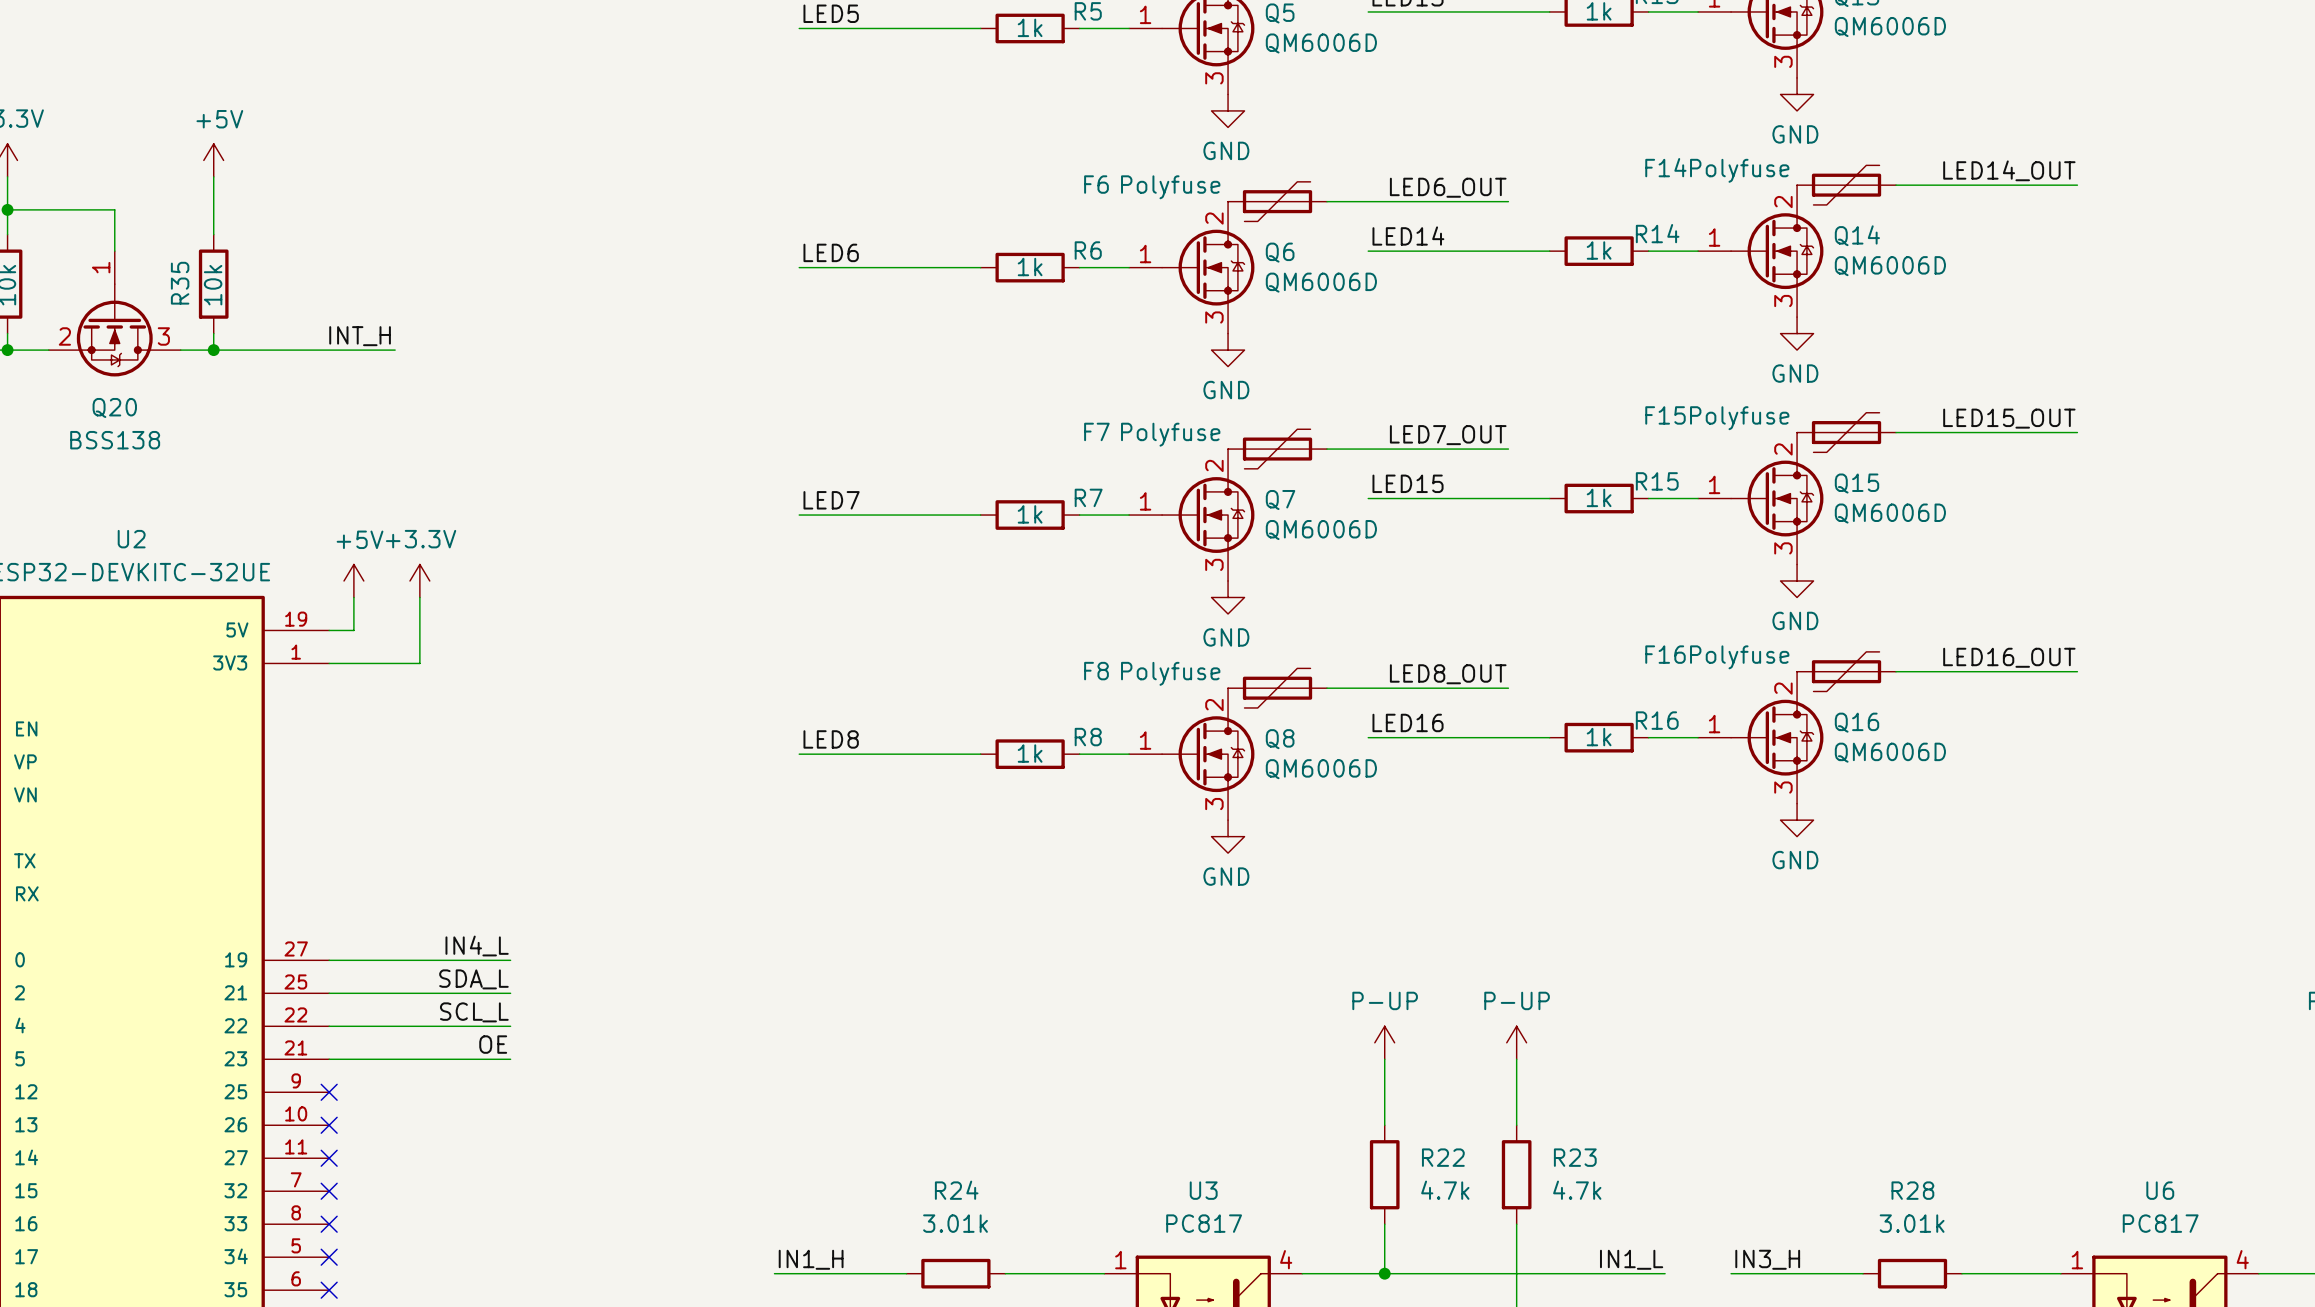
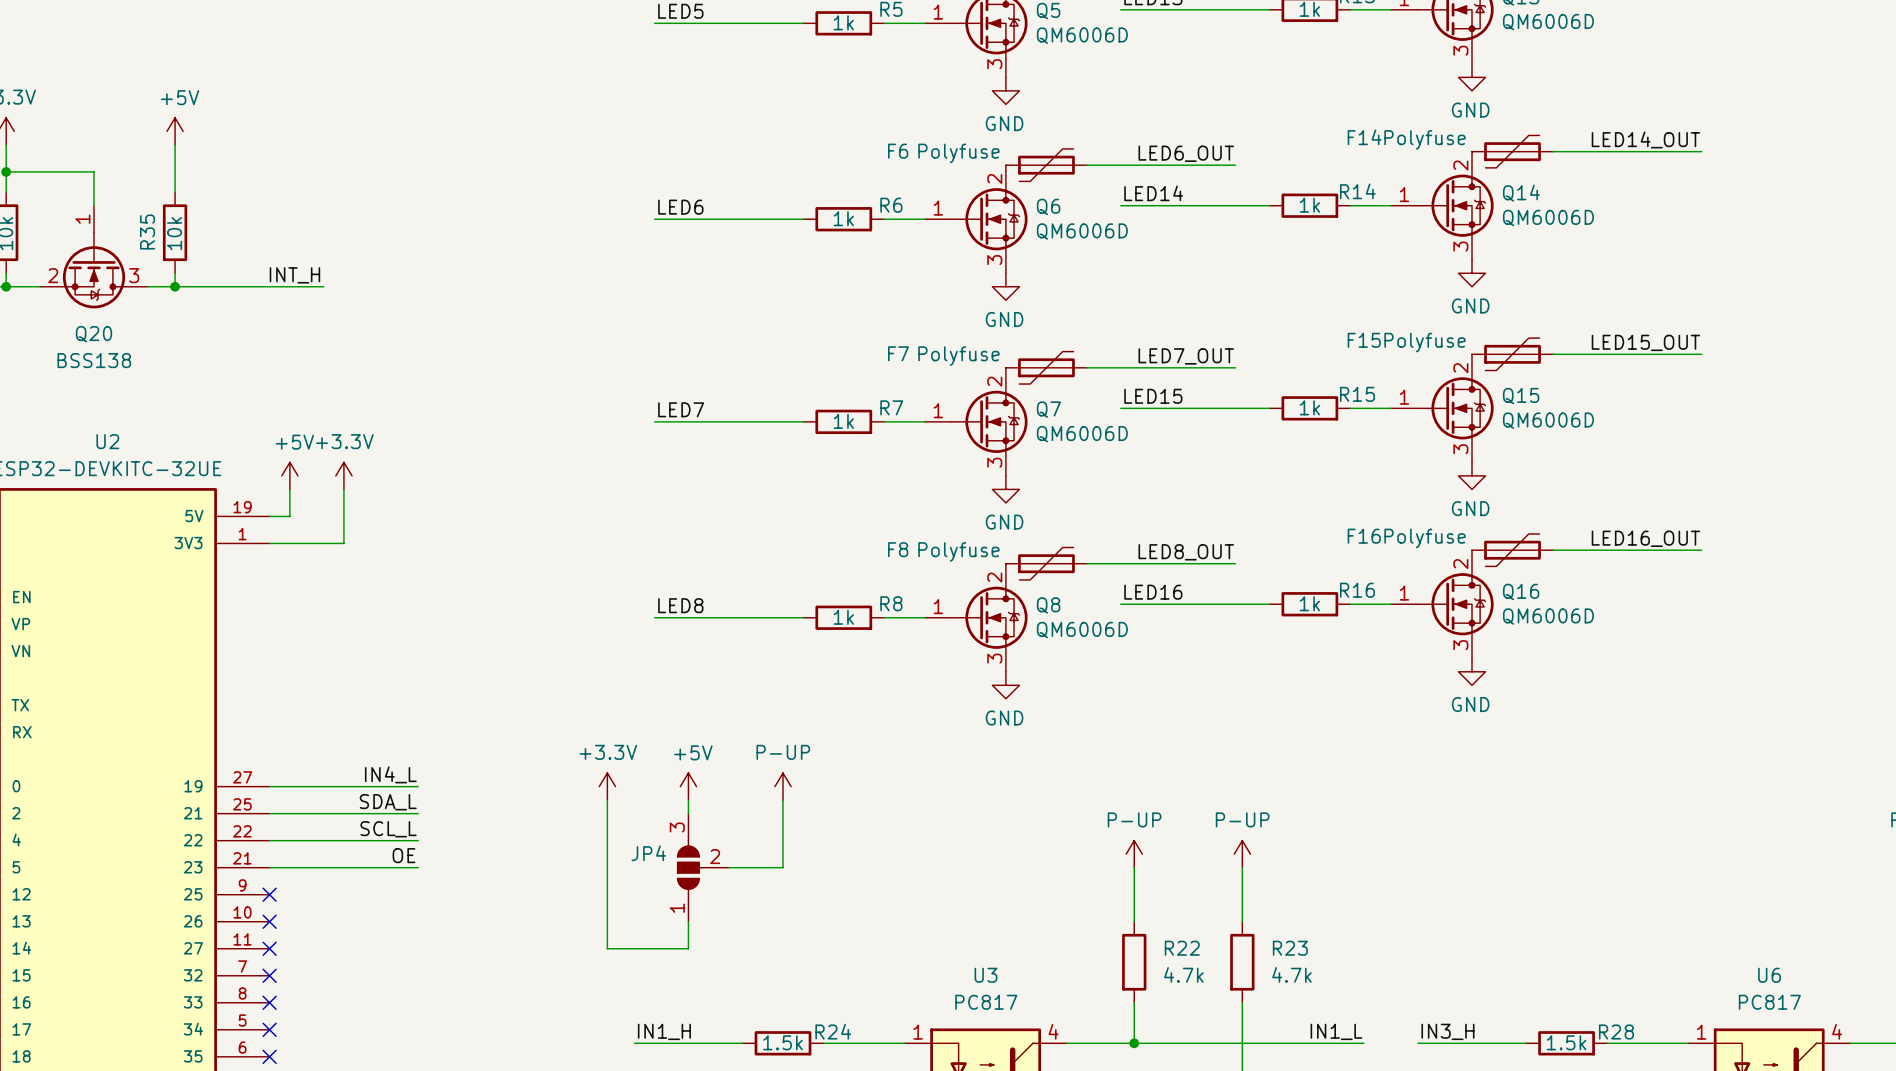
power symbol: none -> +3.3V (607, 786)
power symbol: none -> +5V (688, 786)
power symbol: none -> P-UP (783, 786)
wire: none -> (607, 800) (607, 948) (688, 948) (688, 921)
wire: none -> (688, 800) (688, 813)
wire: none -> (783, 800) (783, 867) (728, 867)
JP4: none -> (703, 867)
R24 name position: R24 (956, 1190) -> R24 (833, 1031)
R28 name position: R28 (1912, 1190) -> R28 (1616, 1032)
R24 text: 3.01k (955, 1223) -> 1.5k (783, 1042)
R28 text: 3.01k (1912, 1223) -> 1.5k (1566, 1042)

